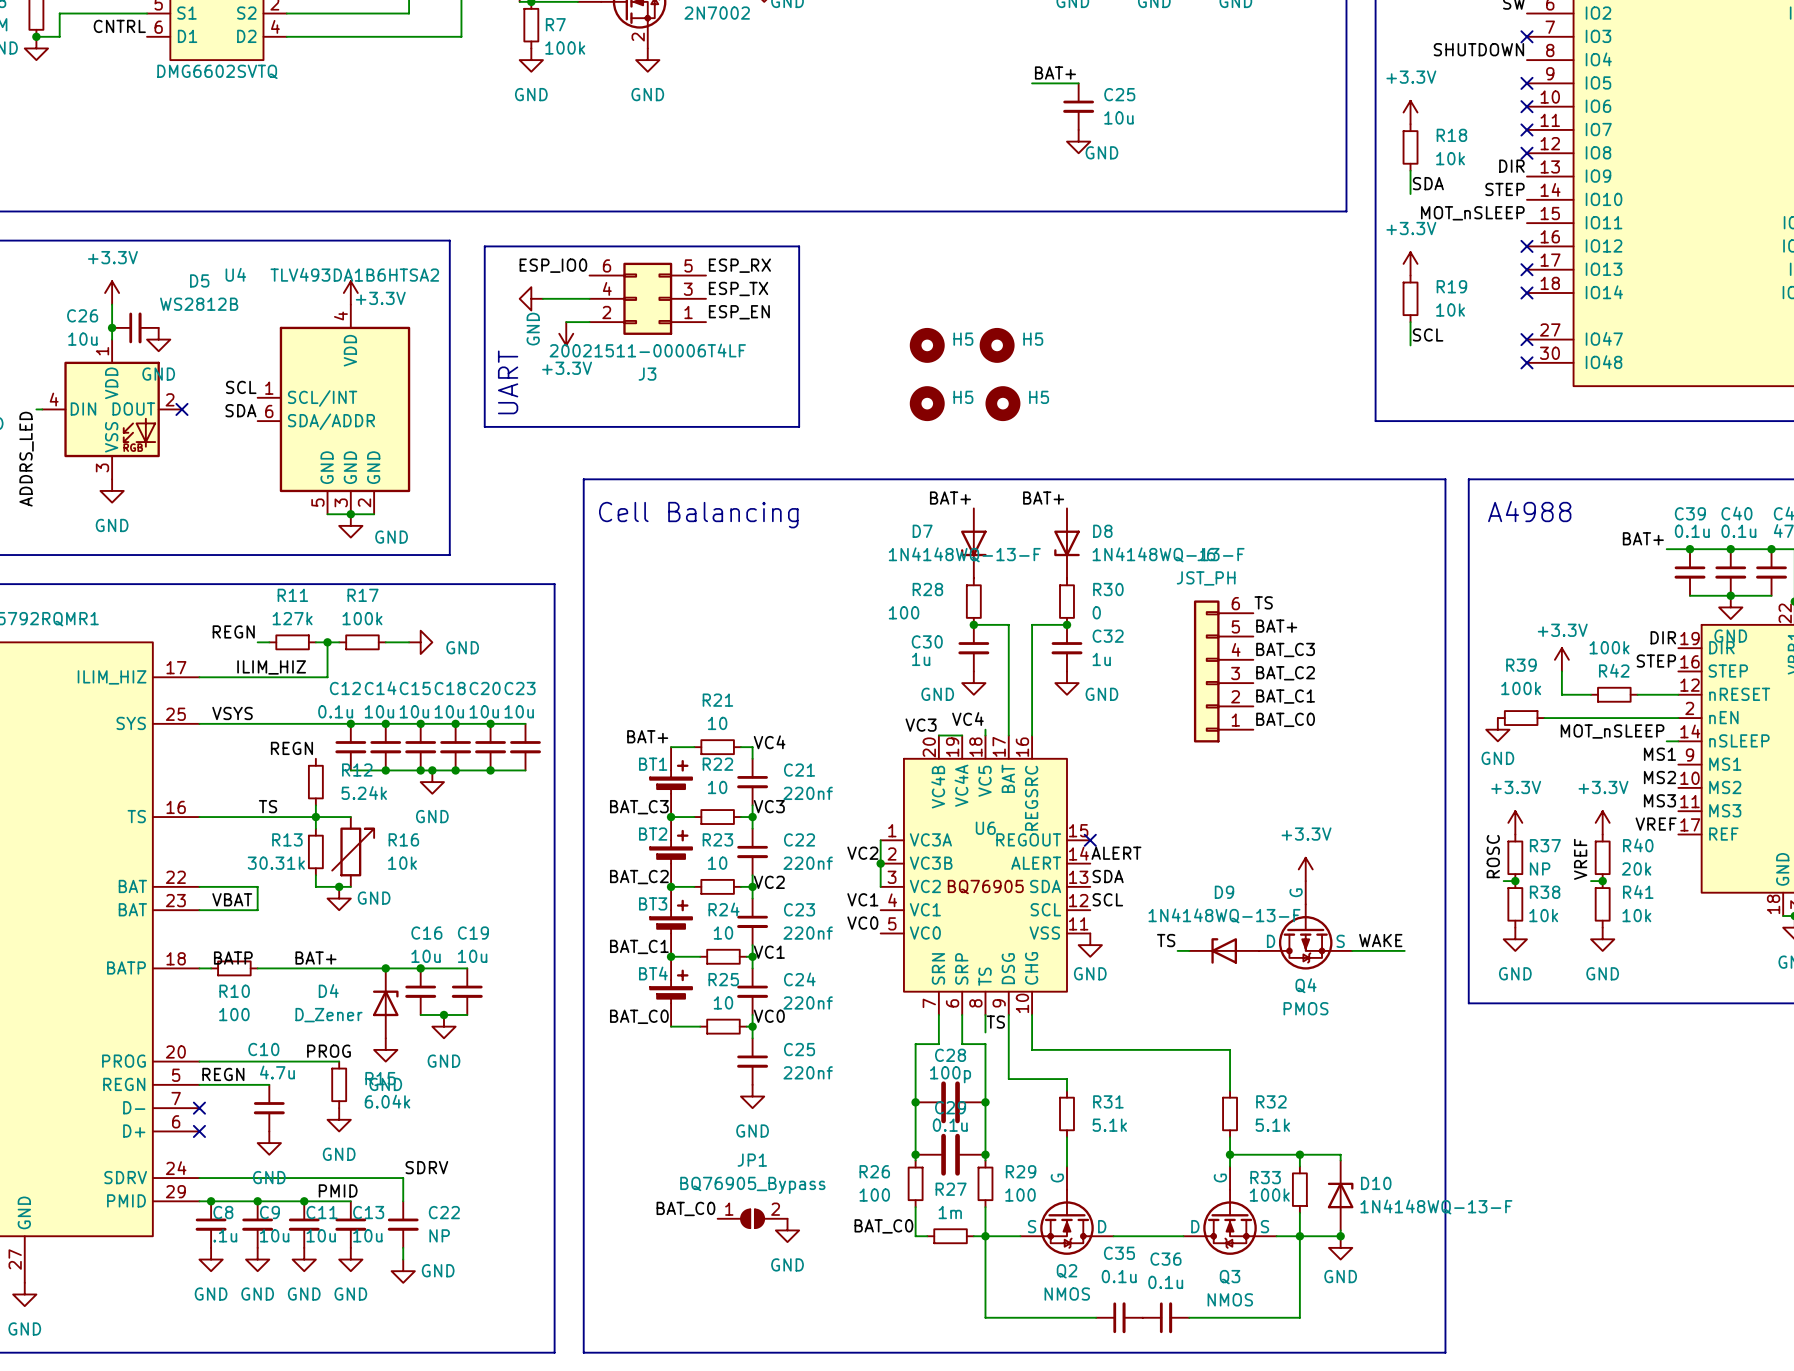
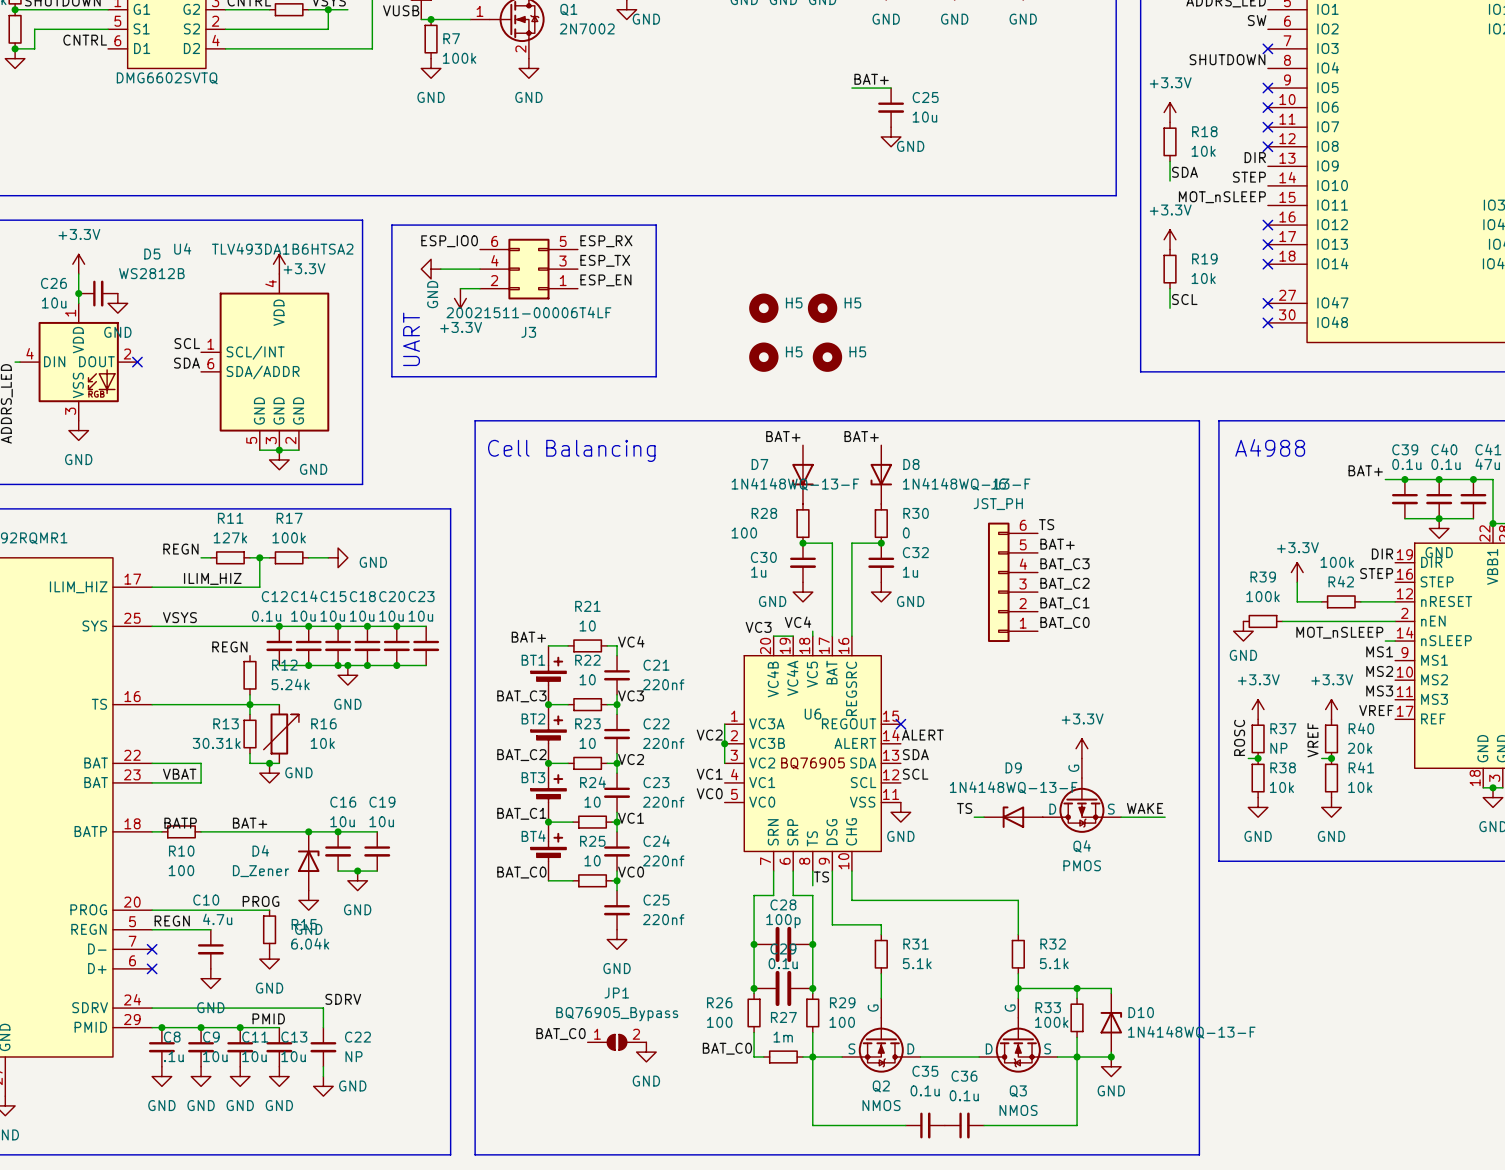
label: TS (268, 806) -> none

